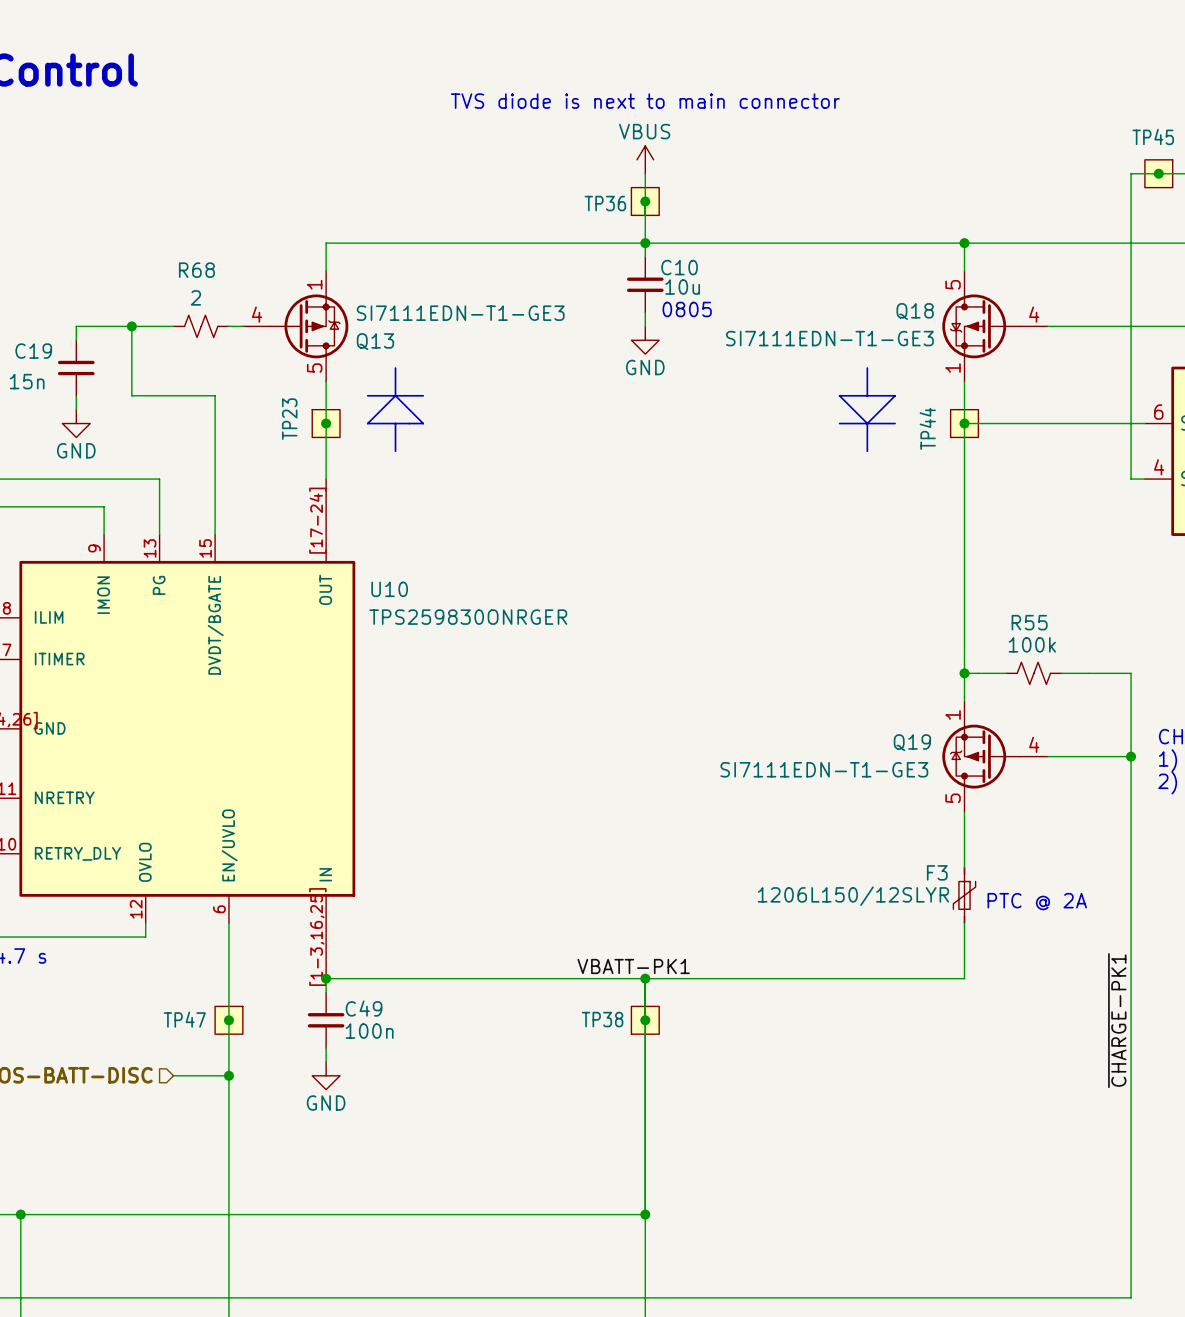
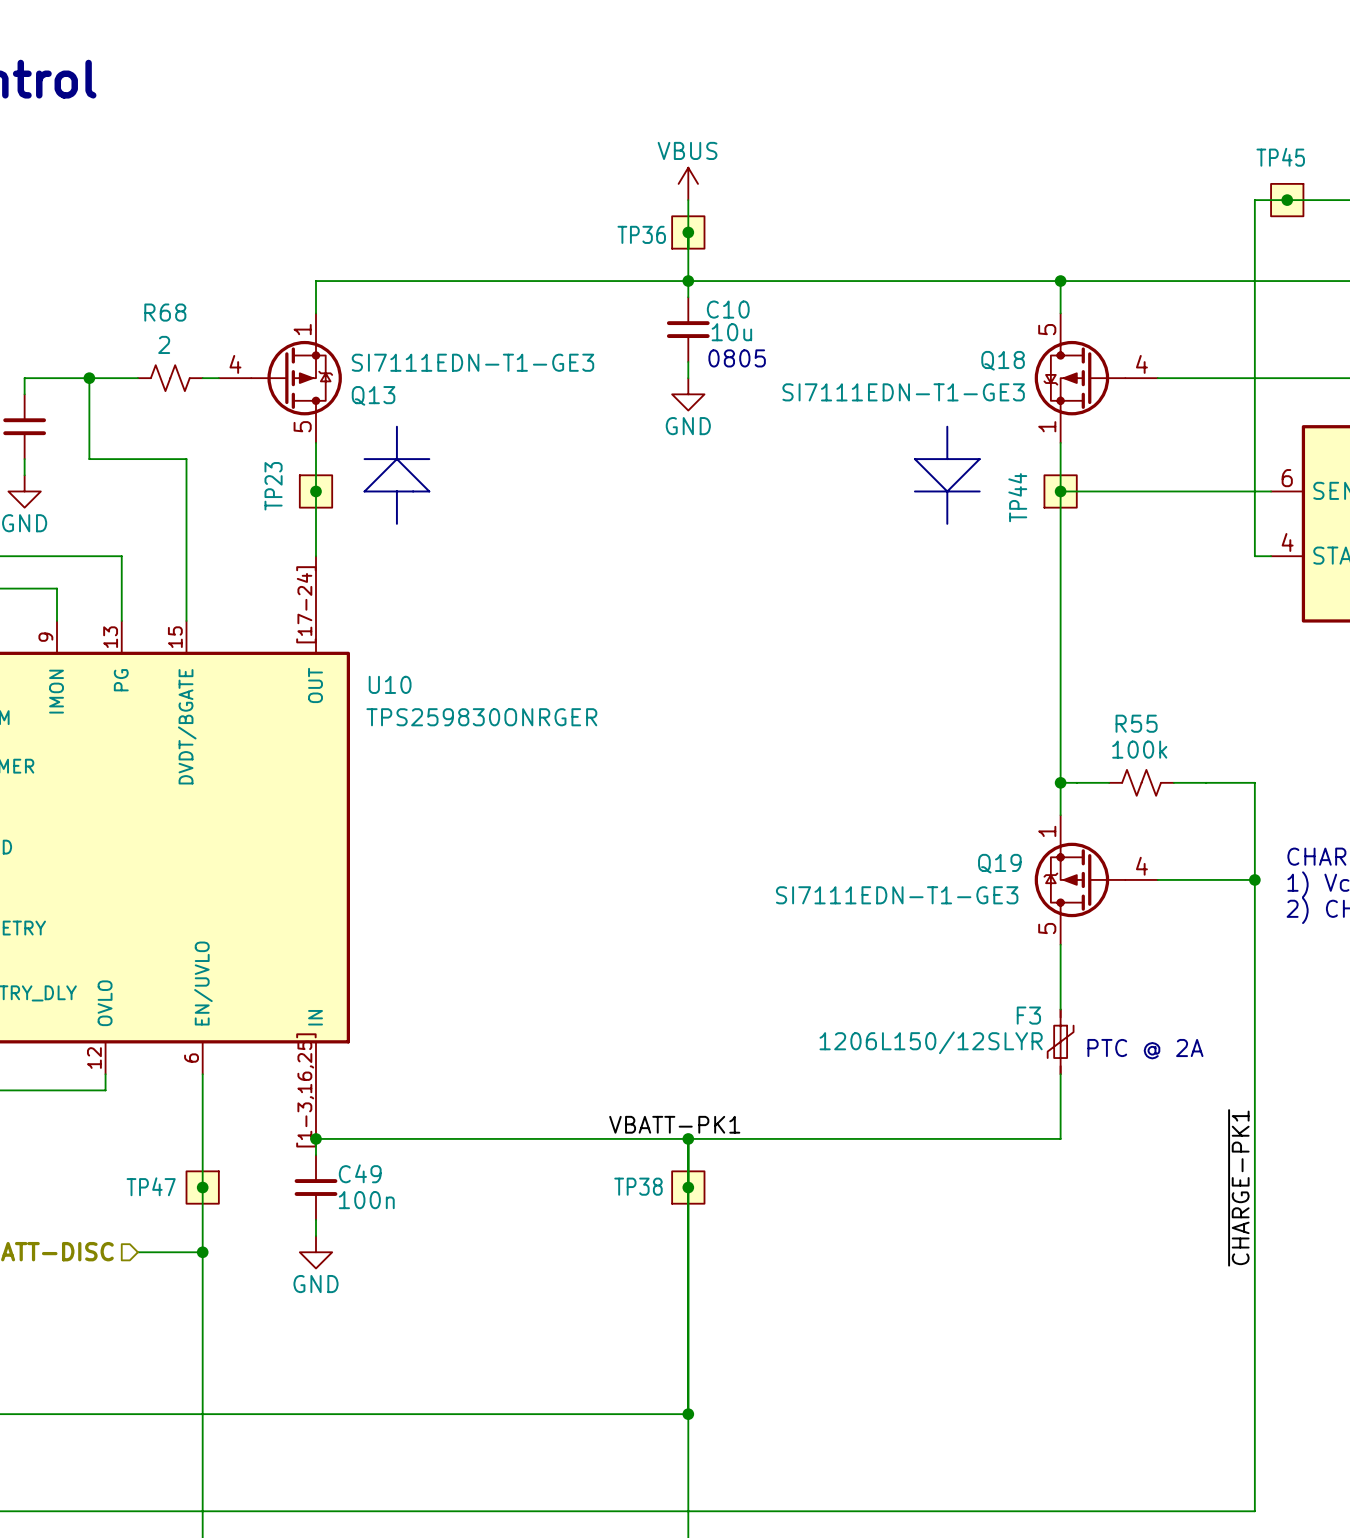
text: TVS diode is next to main connector (645, 101) -> none

